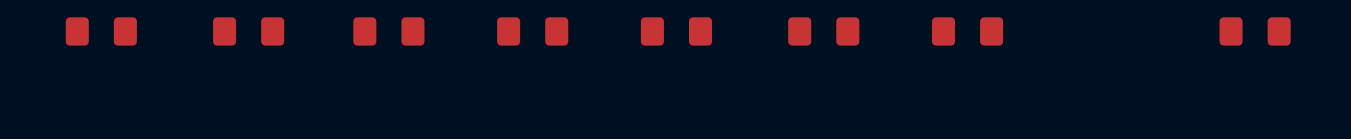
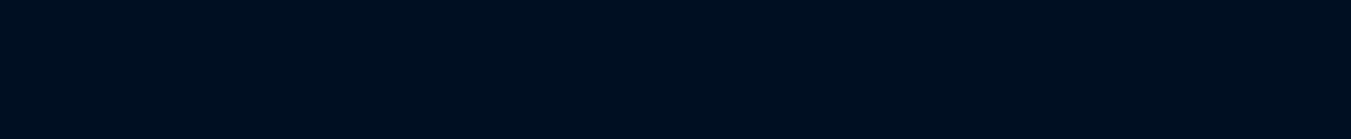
part: (101, 31) -> none
part: (248, 31) -> none
part: (388, 31) -> none
part: (532, 31) -> none
part: (676, 31) -> none
part: (823, 31) -> none
part: (967, 31) -> none
part: (1255, 31) -> none

